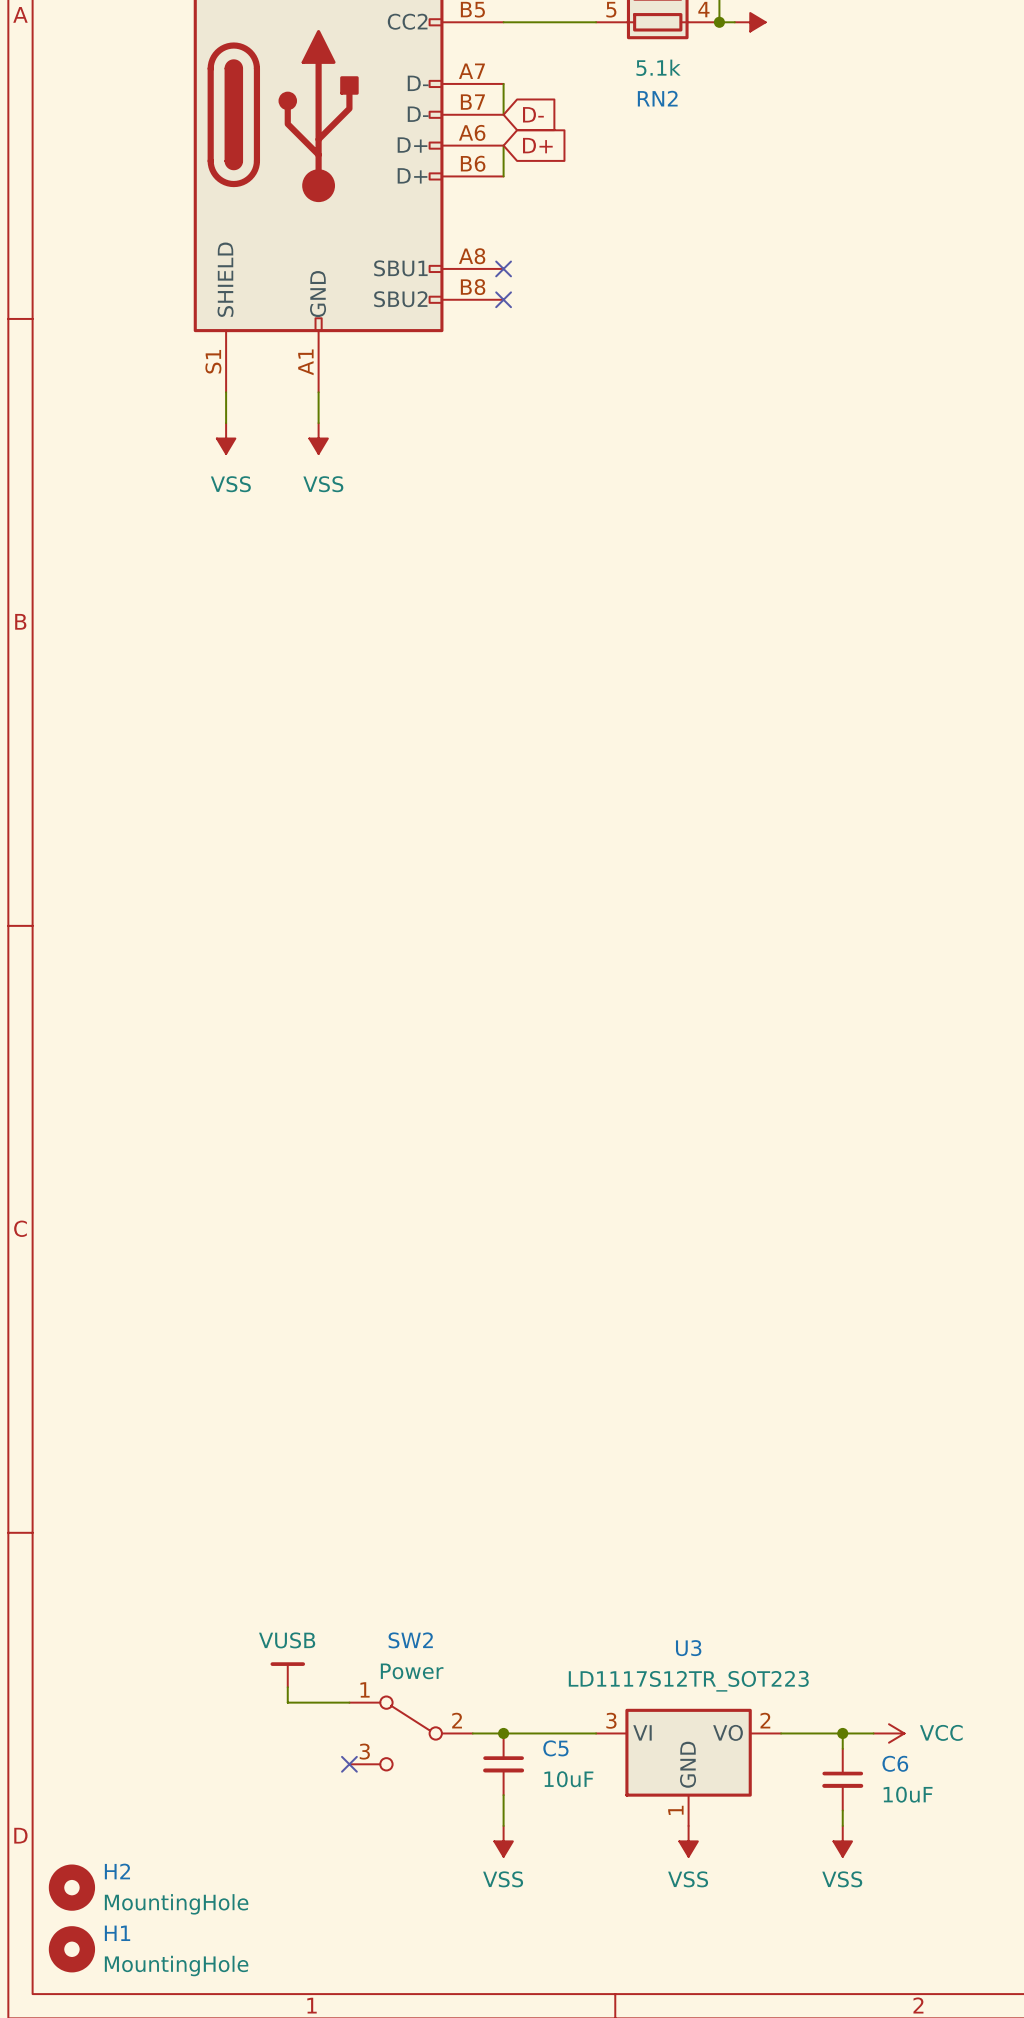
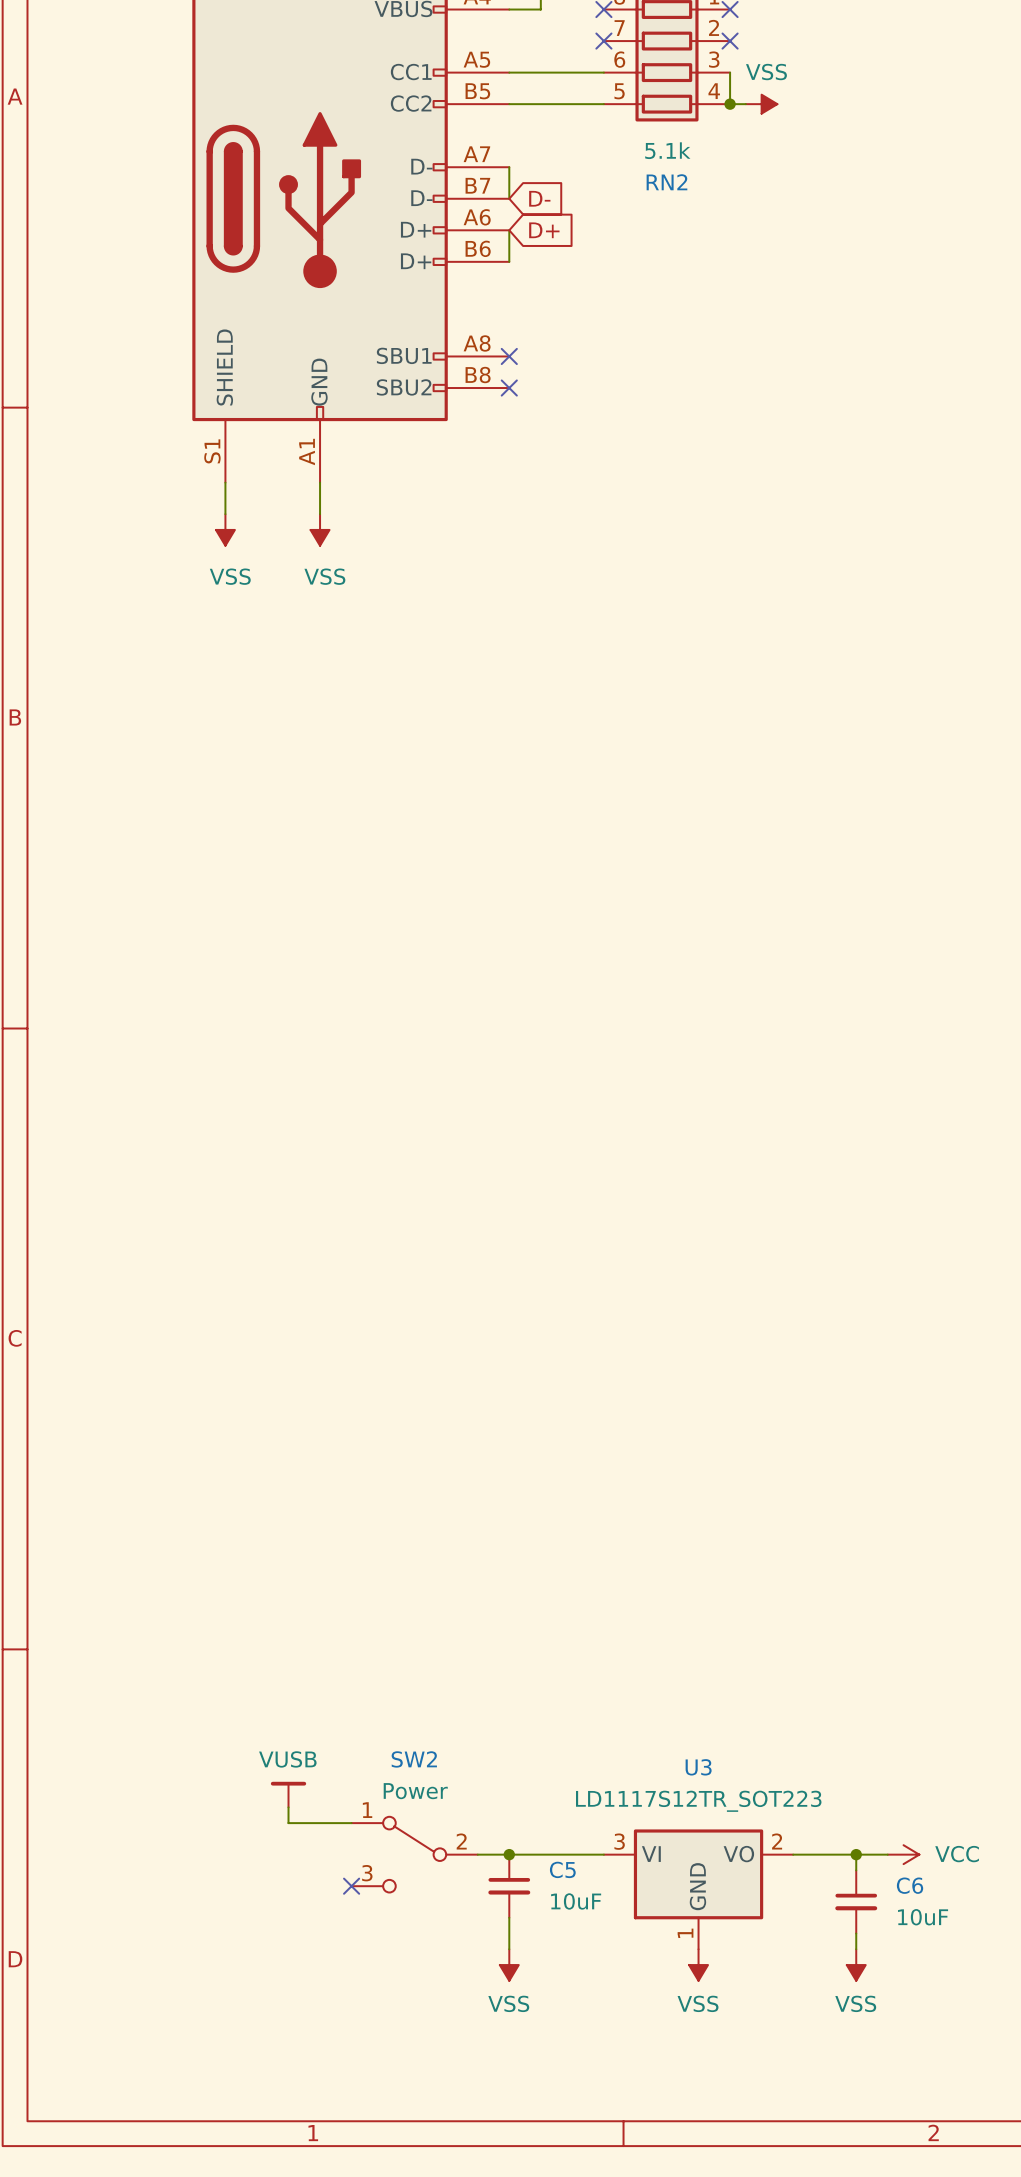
H2: MountingHole (71, 1887) -> none
H1: MountingHole (71, 1949) -> none

